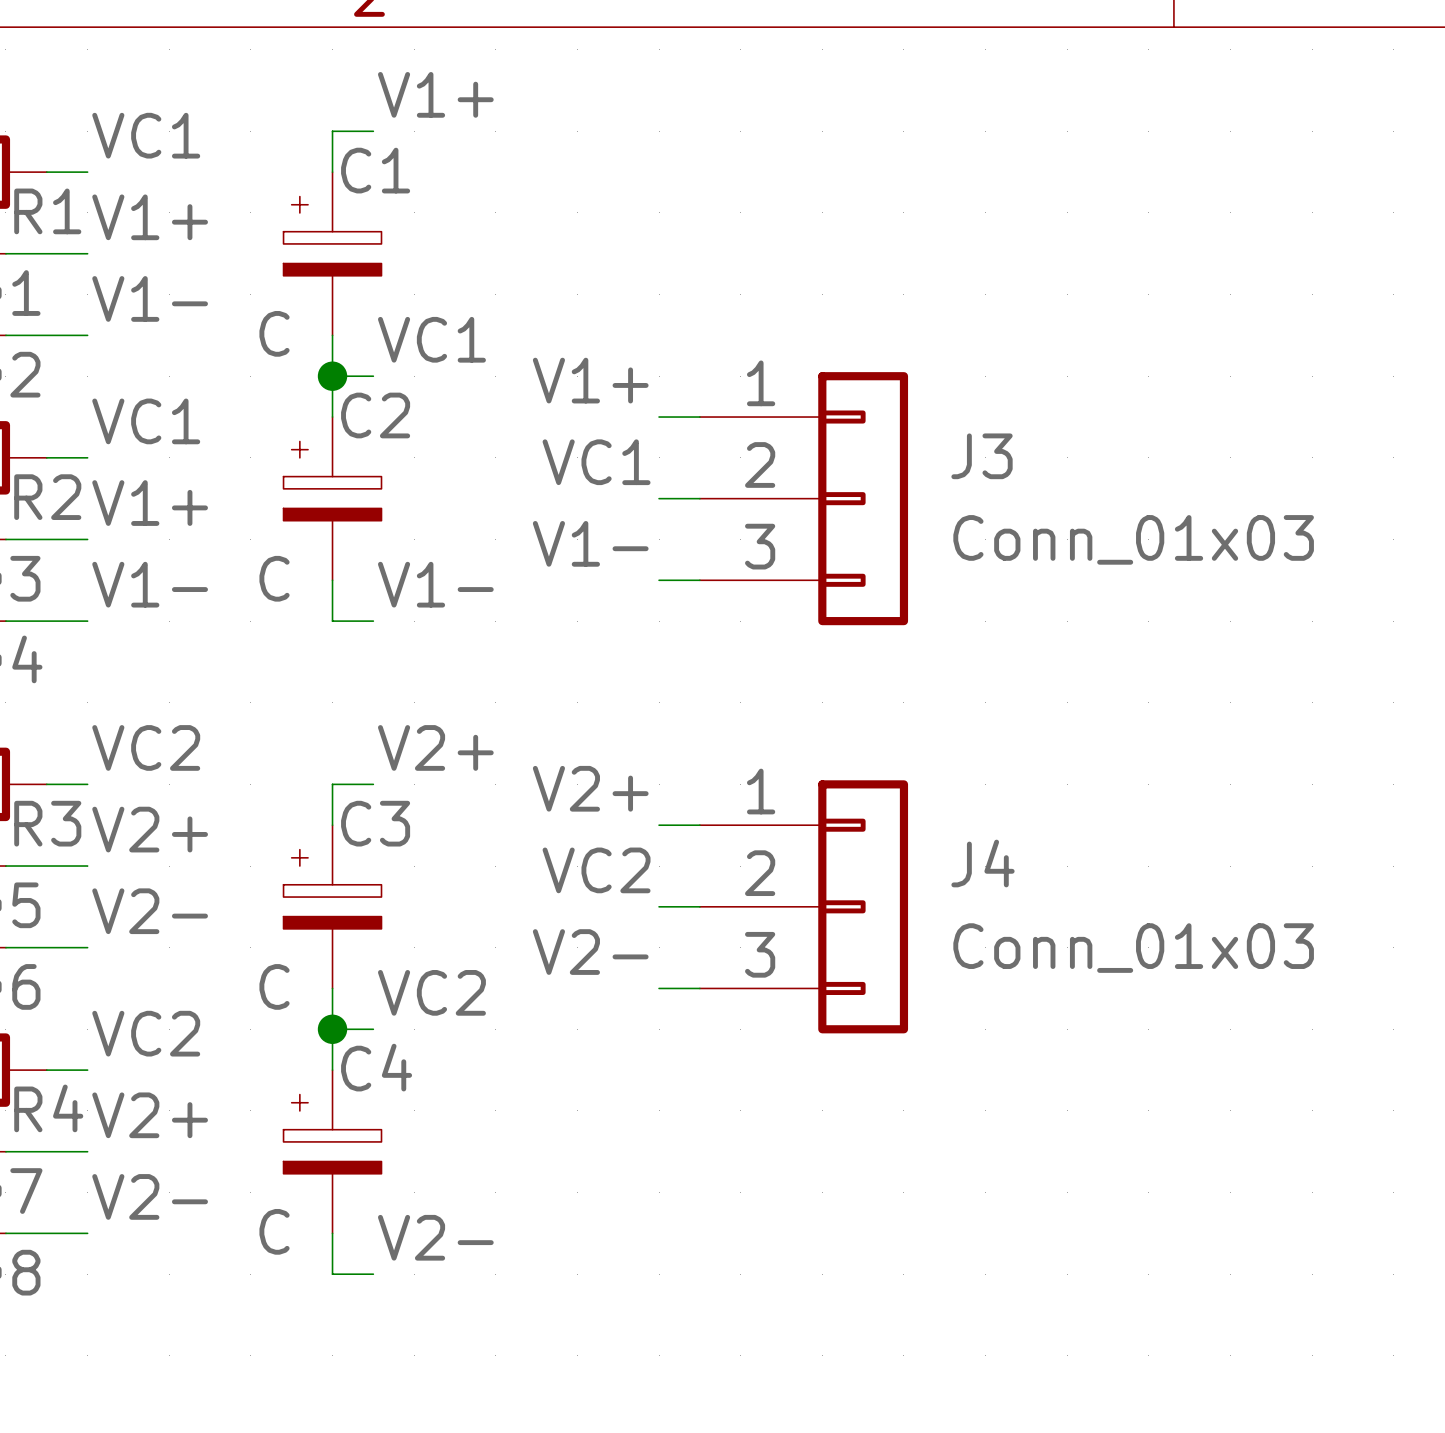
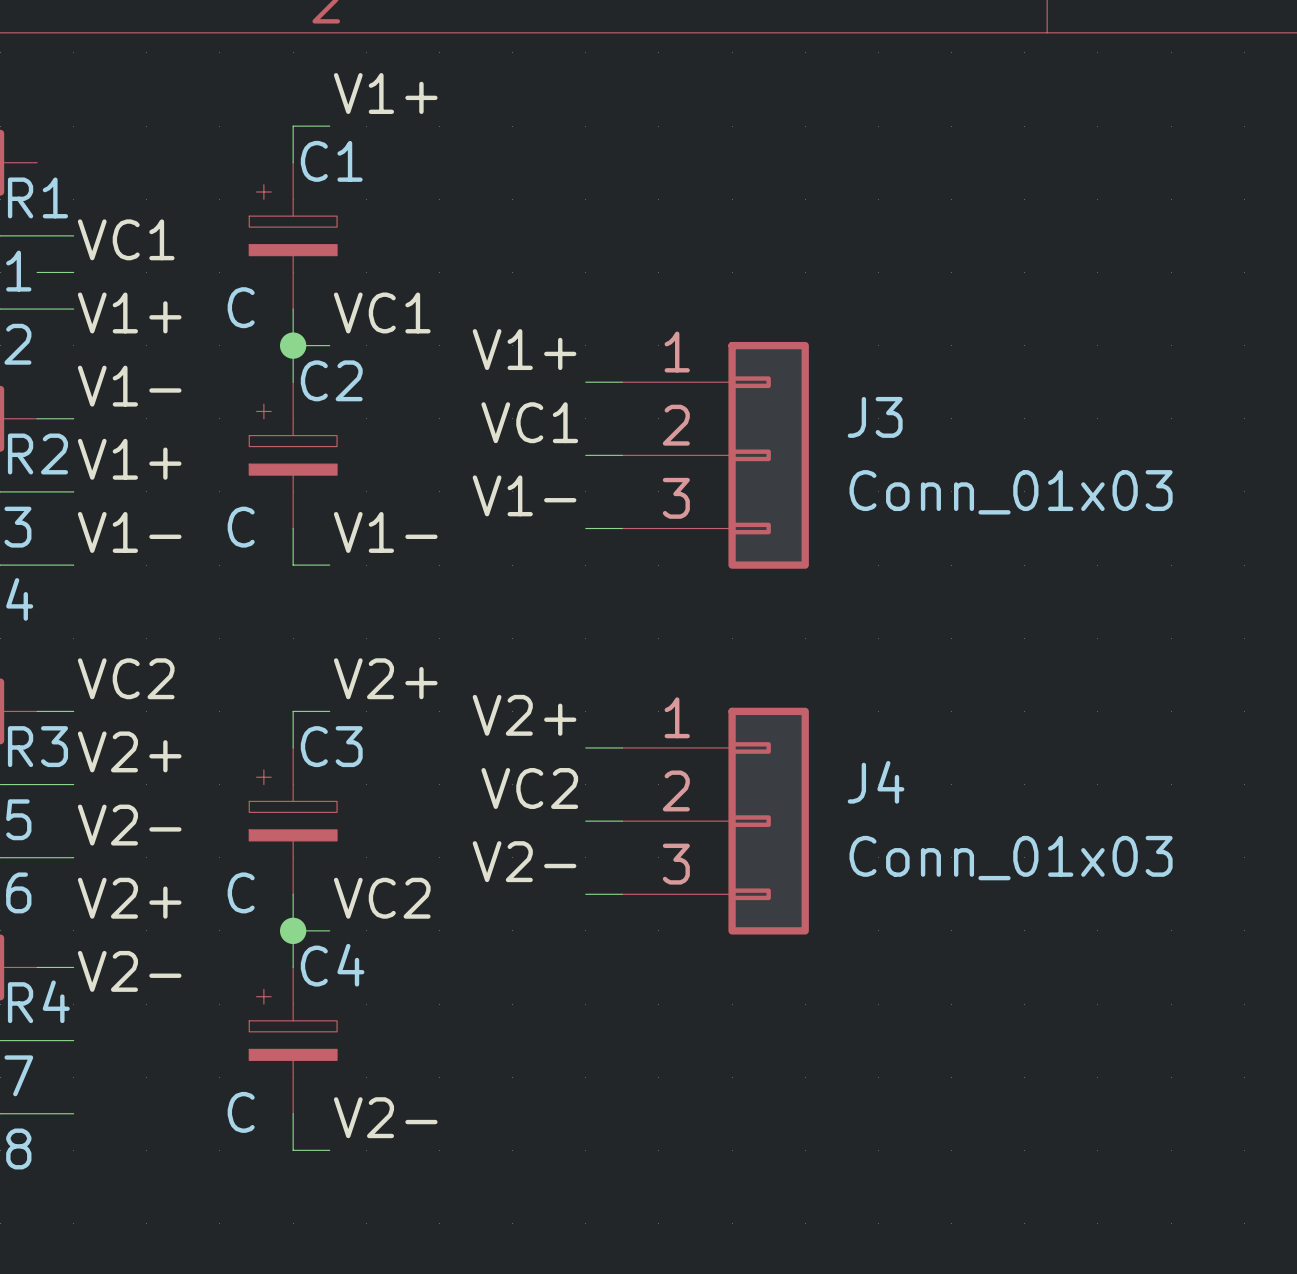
label position: VC1 (146, 135) -> VC1 (126, 239)
wire: (46, 172) (87, 172) -> (37, 272) (73, 272)
label position: V1+ (150, 217) -> V1+ (129, 312)
label: V1- (150, 298) -> none
label: VC1 (146, 421) -> V1- (129, 386)
label: VC2 (146, 1033) -> none
label position: V2+ (150, 1115) -> V2+ (129, 898)
label position: V2- (150, 1196) -> V2- (129, 971)

